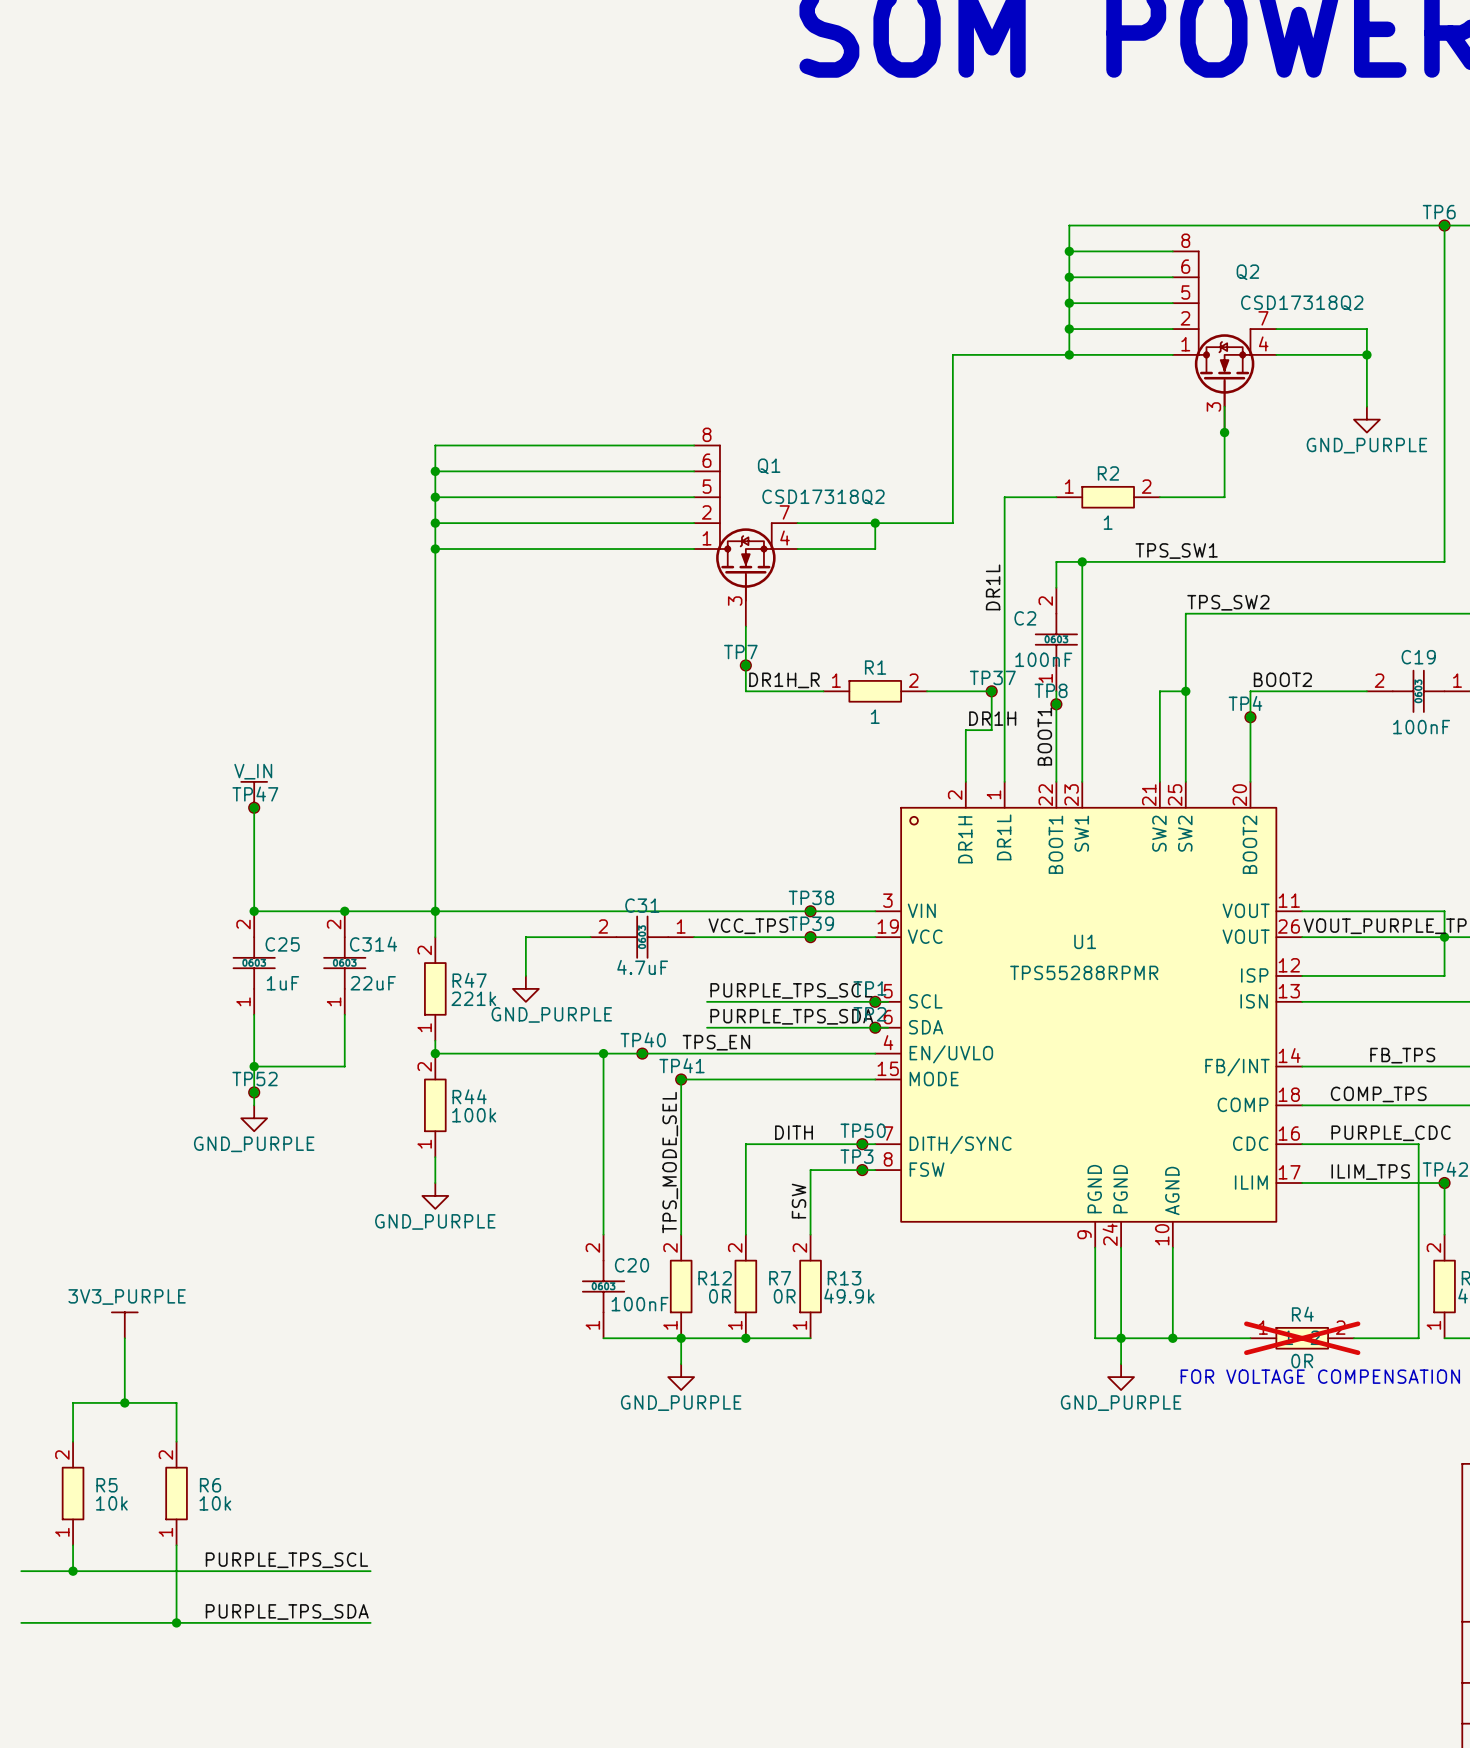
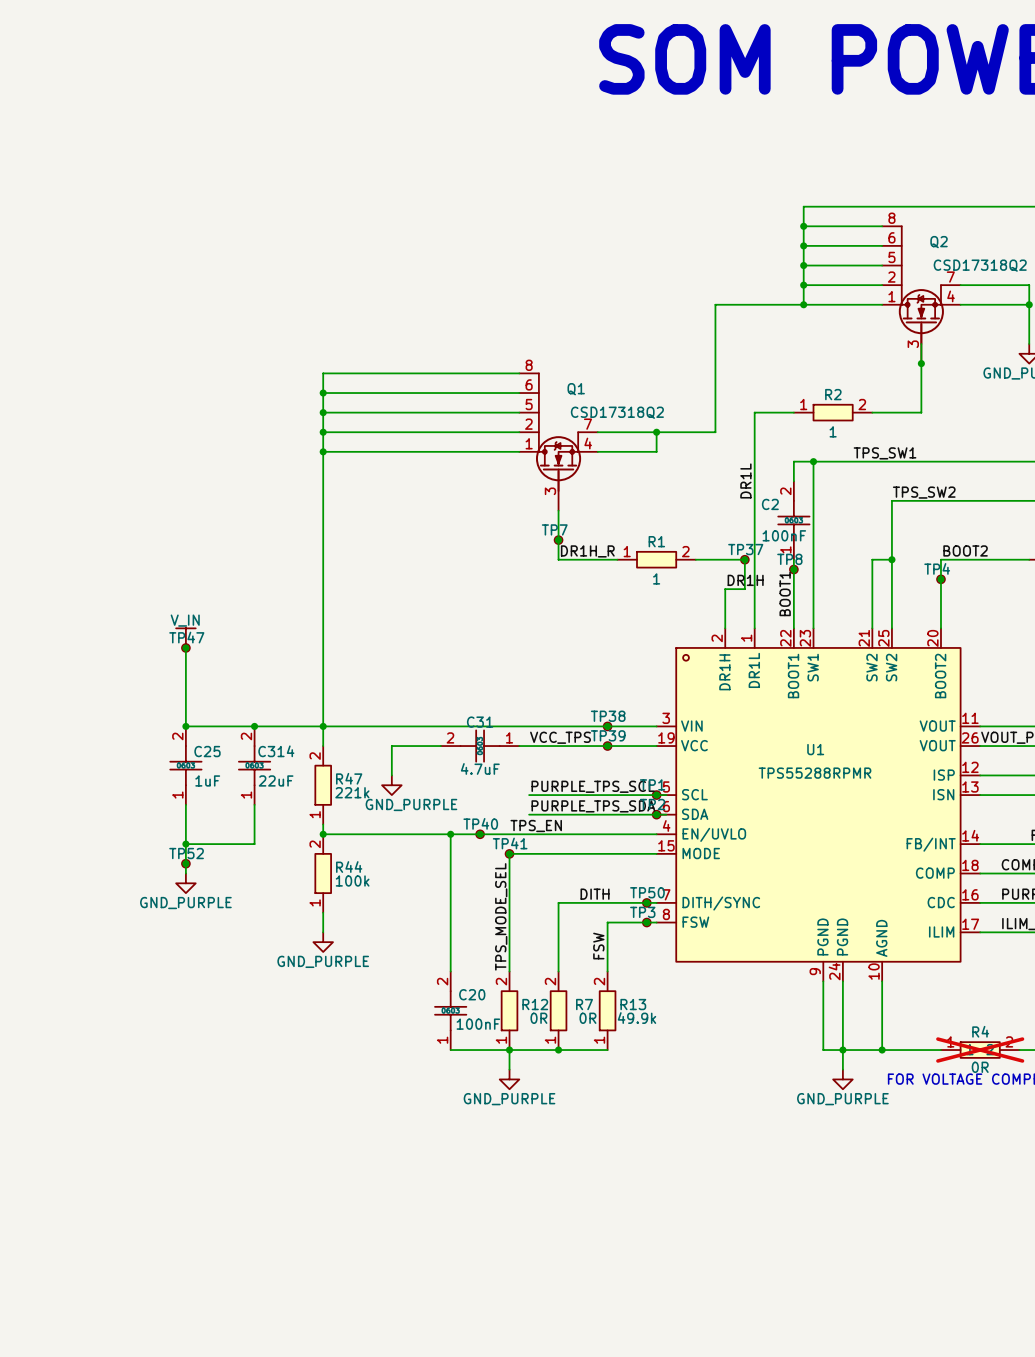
power symbol: 3V3_PURPLE (124, 1325) -> none
wire: (124, 1338) (124, 1402) -> none
junction: (124, 1402) -> none
wire: (73, 1441) (73, 1402) (176, 1402) (176, 1441) -> none
R5: (73, 1493) -> none
R6: (176, 1493) -> none
wire: (73, 1545) (73, 1571) -> none
wire: (176, 1545) (176, 1622) -> none
label: PURPLE_TPS_SCL (286, 1560) -> none
wire: (21, 1571) (370, 1571) -> none
junction: (73, 1571) -> none
label: PURPLE_TPS_SDA (287, 1611) -> none
wire: (21, 1622) (370, 1622) -> none
junction: (176, 1622) -> none

